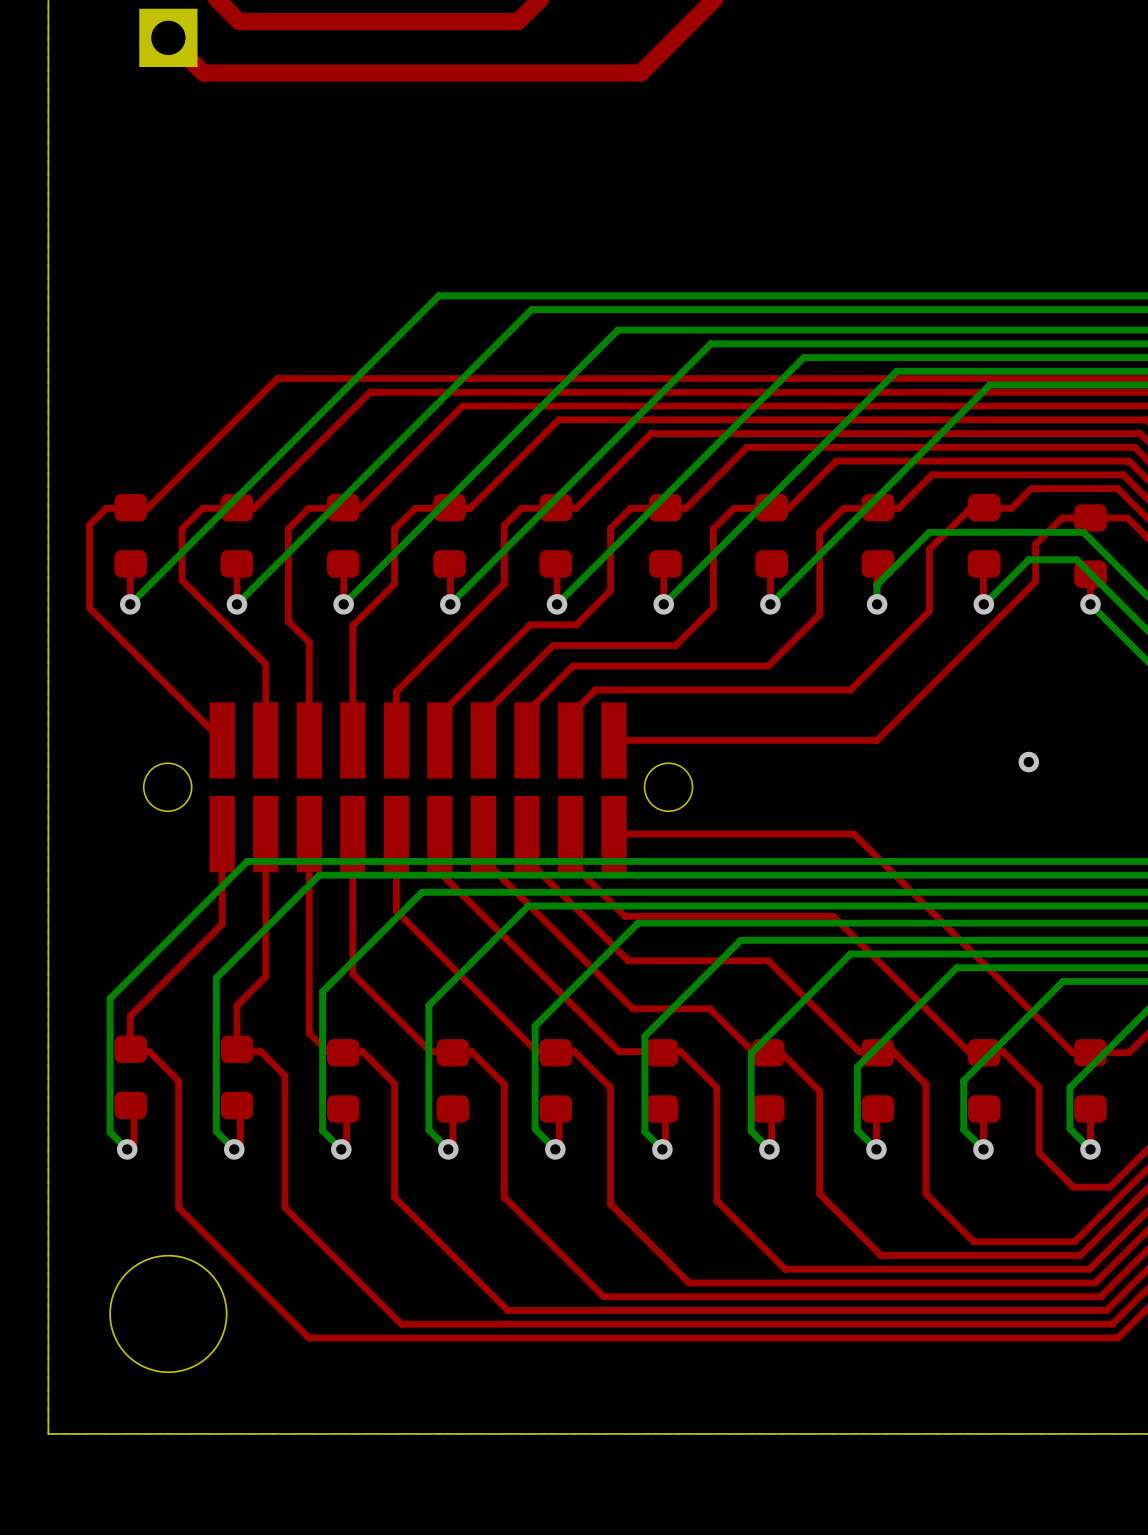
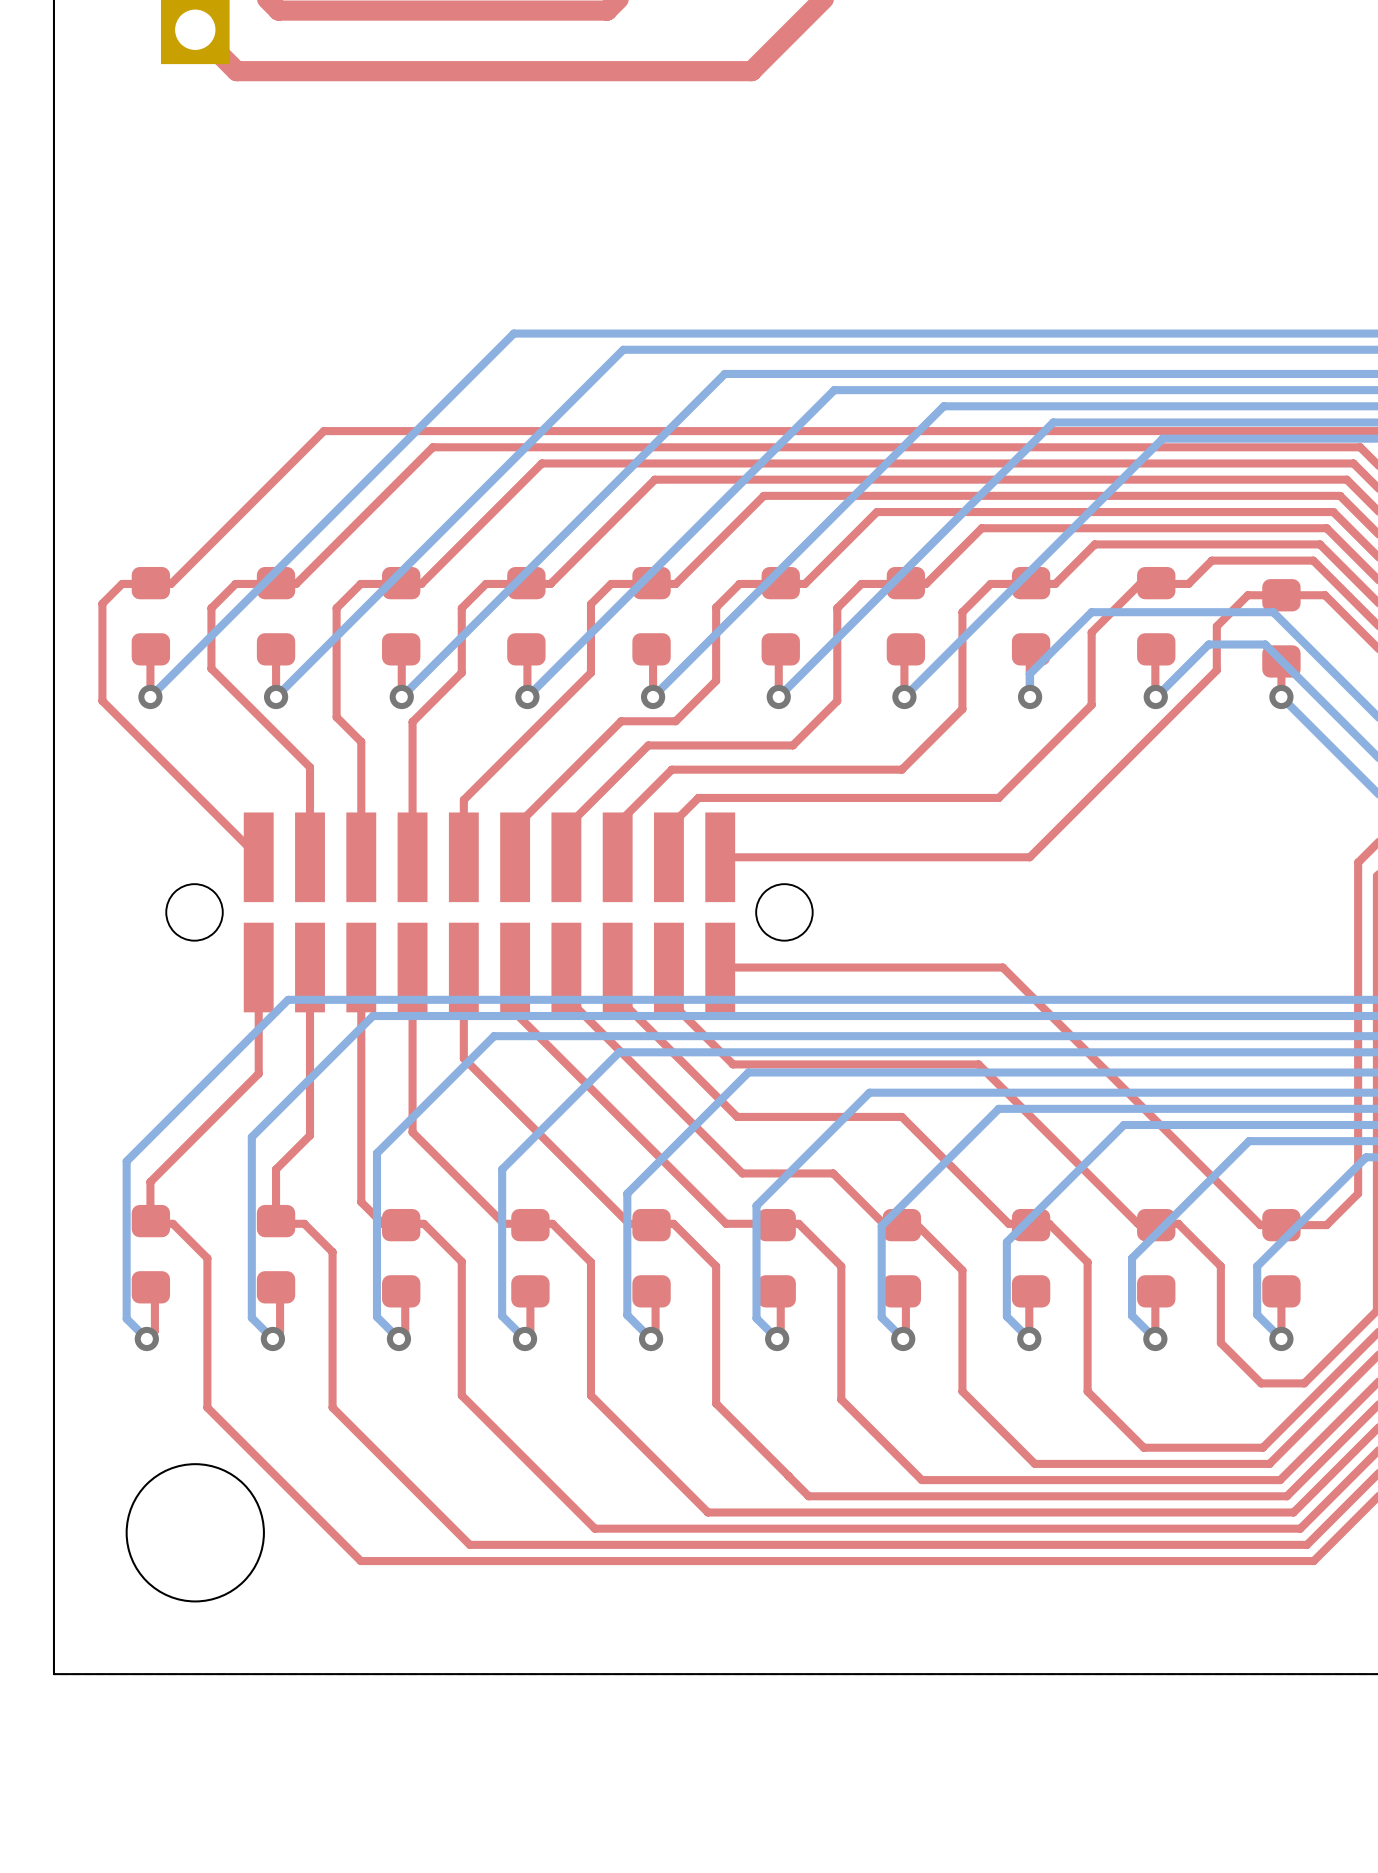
via: (1028, 762) -> none

